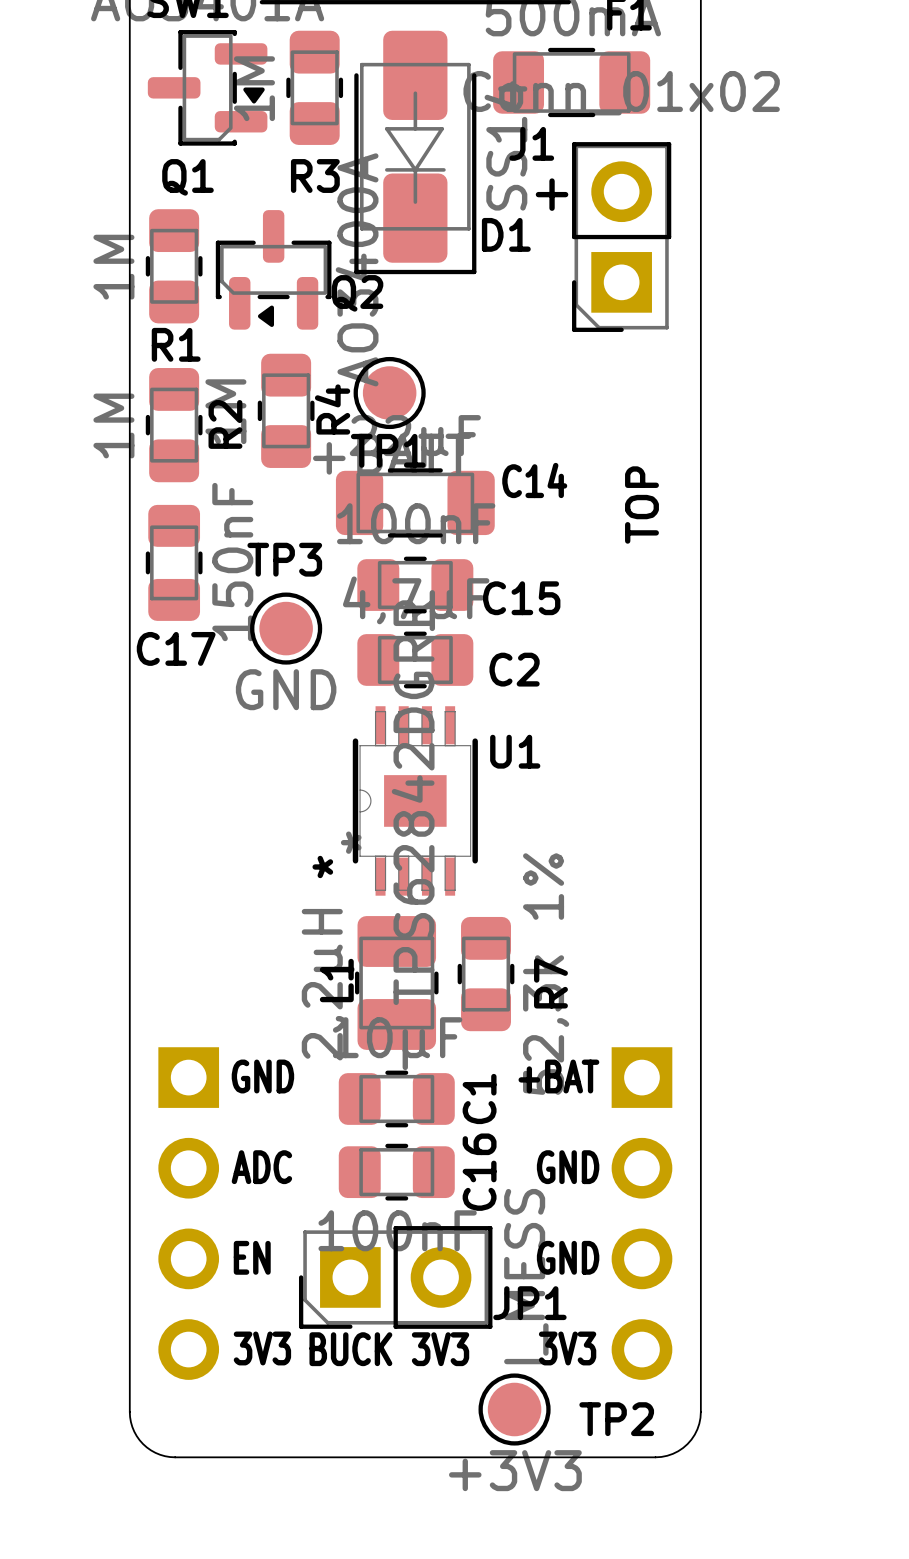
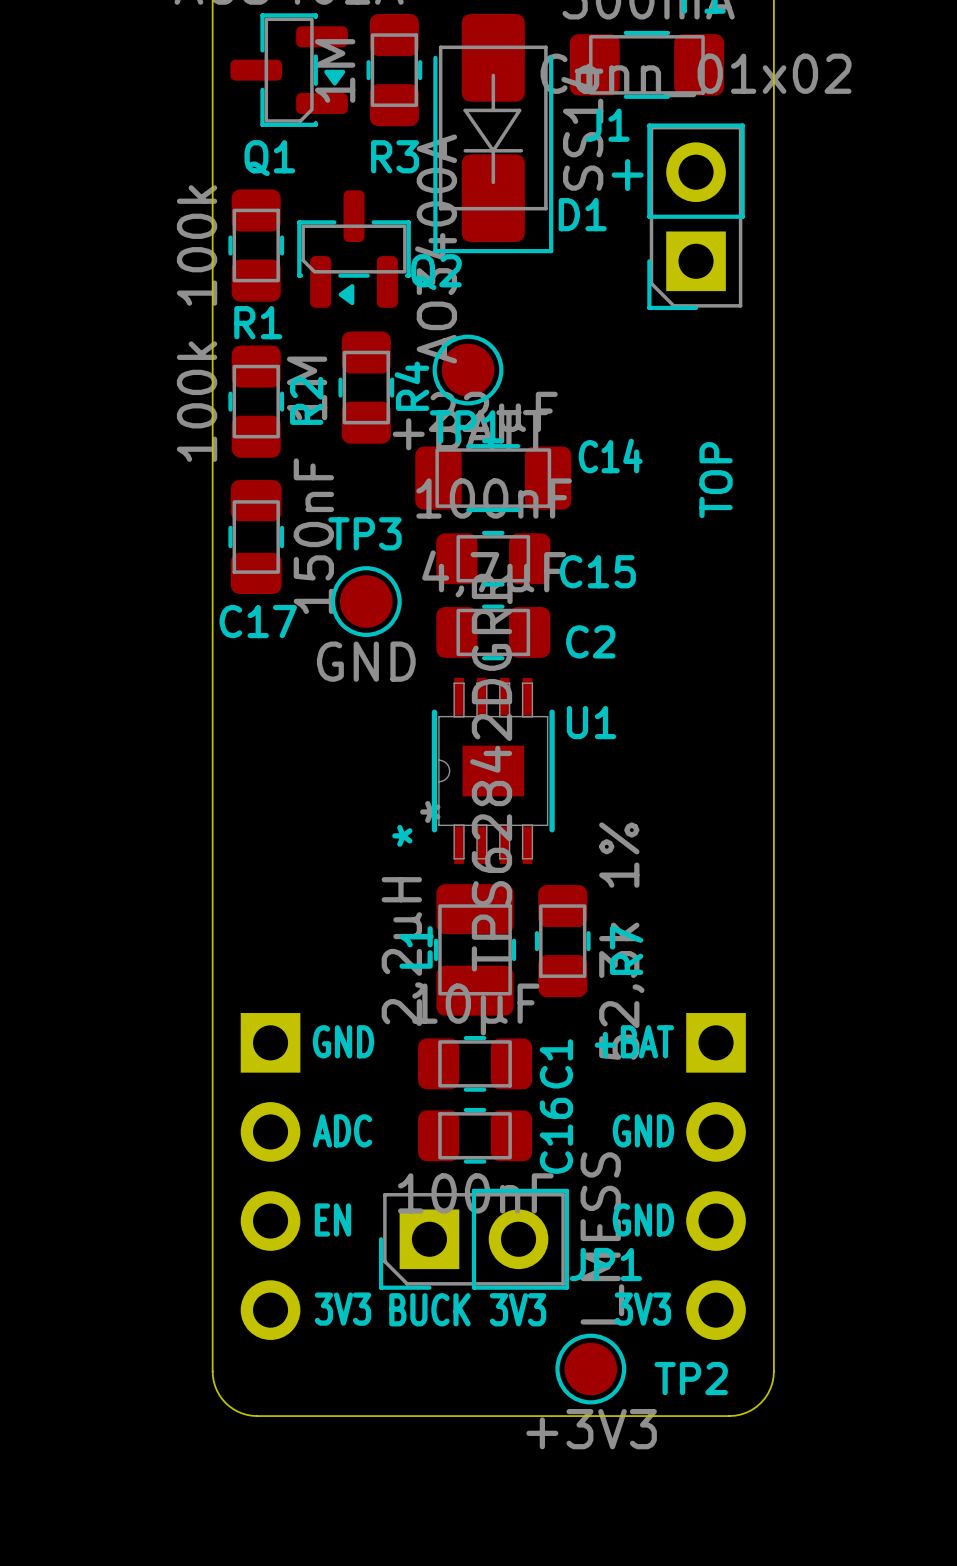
R1 value: 1M (113, 267) -> 100k (197, 245)
R2 value: 1M (113, 425) -> 100k (197, 401)

